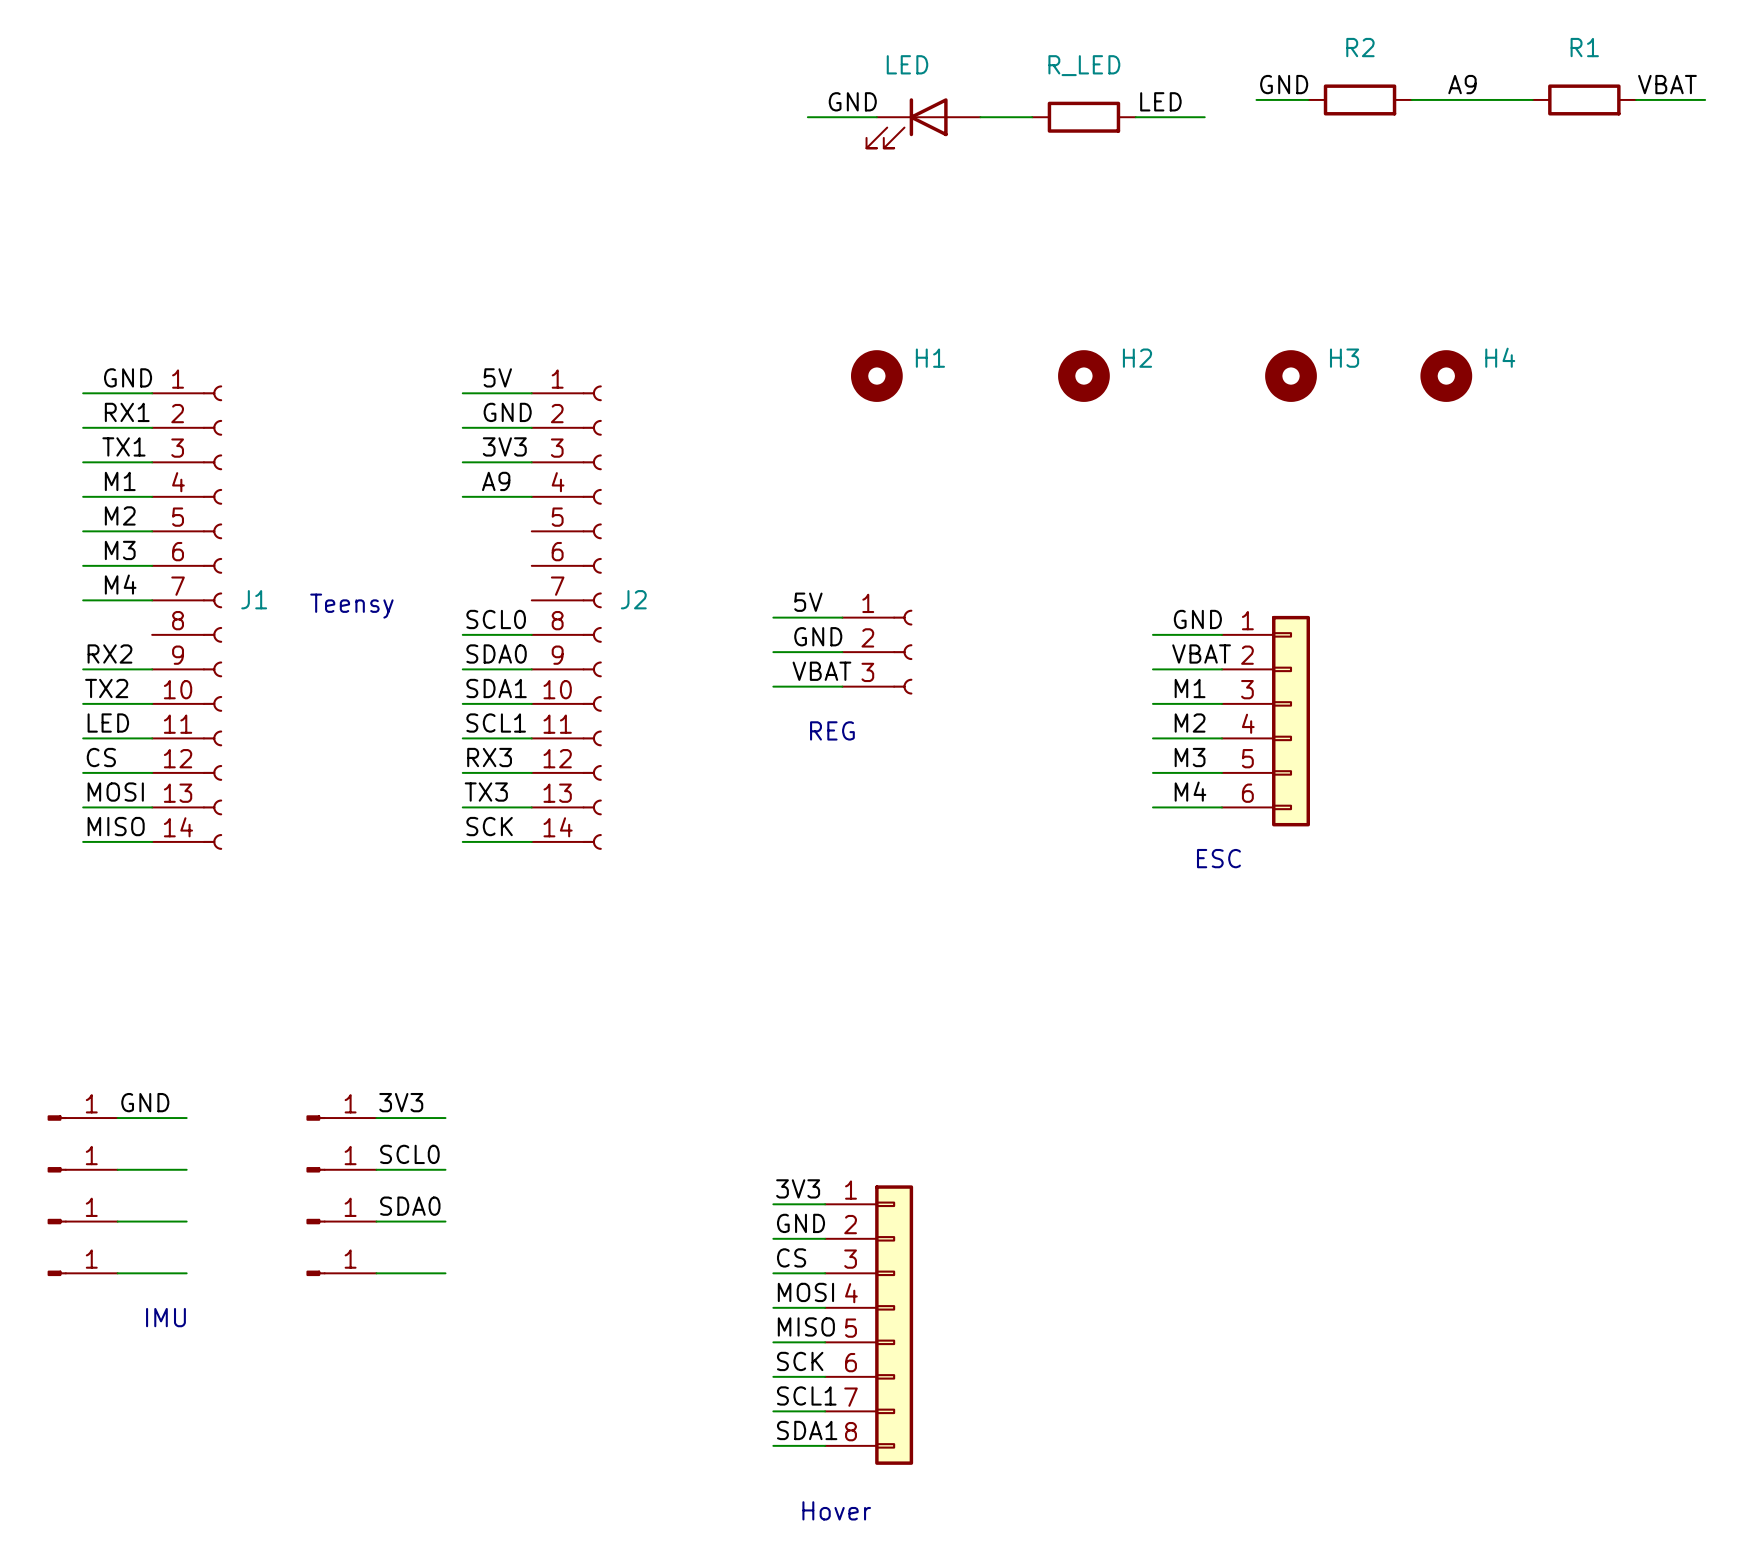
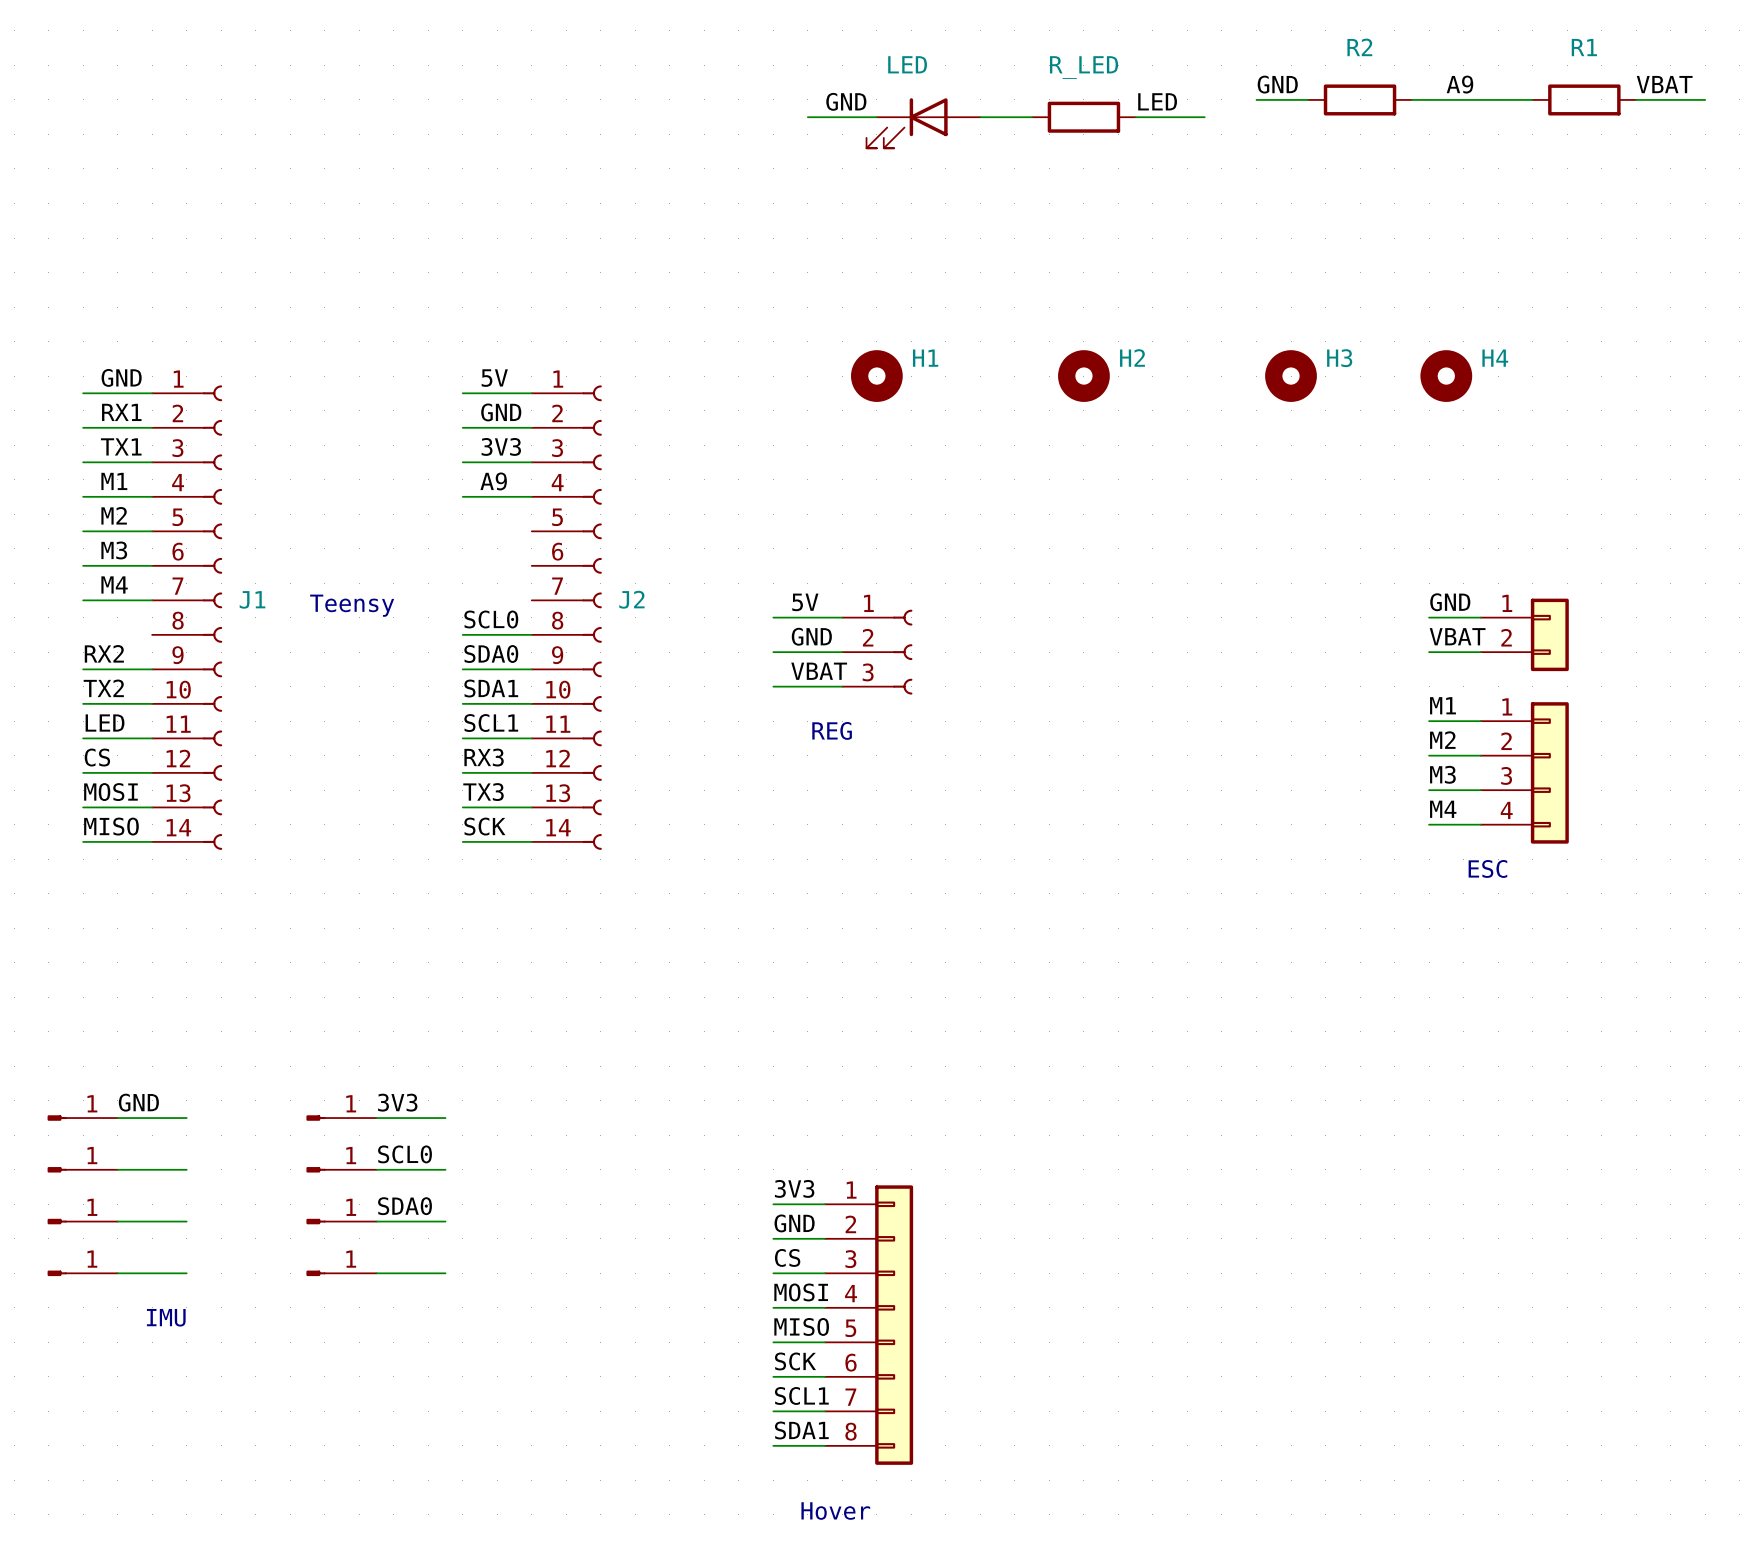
wire: none -> (1429, 617) (1480, 617)
label position: GND (1197, 619) -> GND (1450, 602)
wire: (1152, 634) (1221, 634) -> none
part: none -> (1524, 634)
wire: none -> (1429, 652) (1480, 652)
label position: VBAT (1201, 653) -> VBAT (1457, 636)
wire: (1152, 669) (1221, 669) -> none
label position: M1 (1190, 688) -> M1 (1442, 705)
wire: (1152, 703) (1221, 703) -> none
part: (1265, 721) -> none
wire: none -> (1429, 721) (1480, 721)
label position: M2 (1190, 723) -> M2 (1442, 740)
wire: (1152, 738) (1221, 738) -> none
wire: none -> (1429, 755) (1480, 755)
label position: M3 (1190, 757) -> M3 (1442, 774)
wire: (1152, 772) (1221, 772) -> none
part: none -> (1524, 772)
wire: none -> (1429, 790) (1480, 790)
label position: M4 (1190, 791) -> M4 (1443, 809)
wire: (1152, 807) (1221, 807) -> none
wire: none -> (1429, 824) (1480, 824)
text position: ESC (1218, 858) -> ESC (1487, 868)

